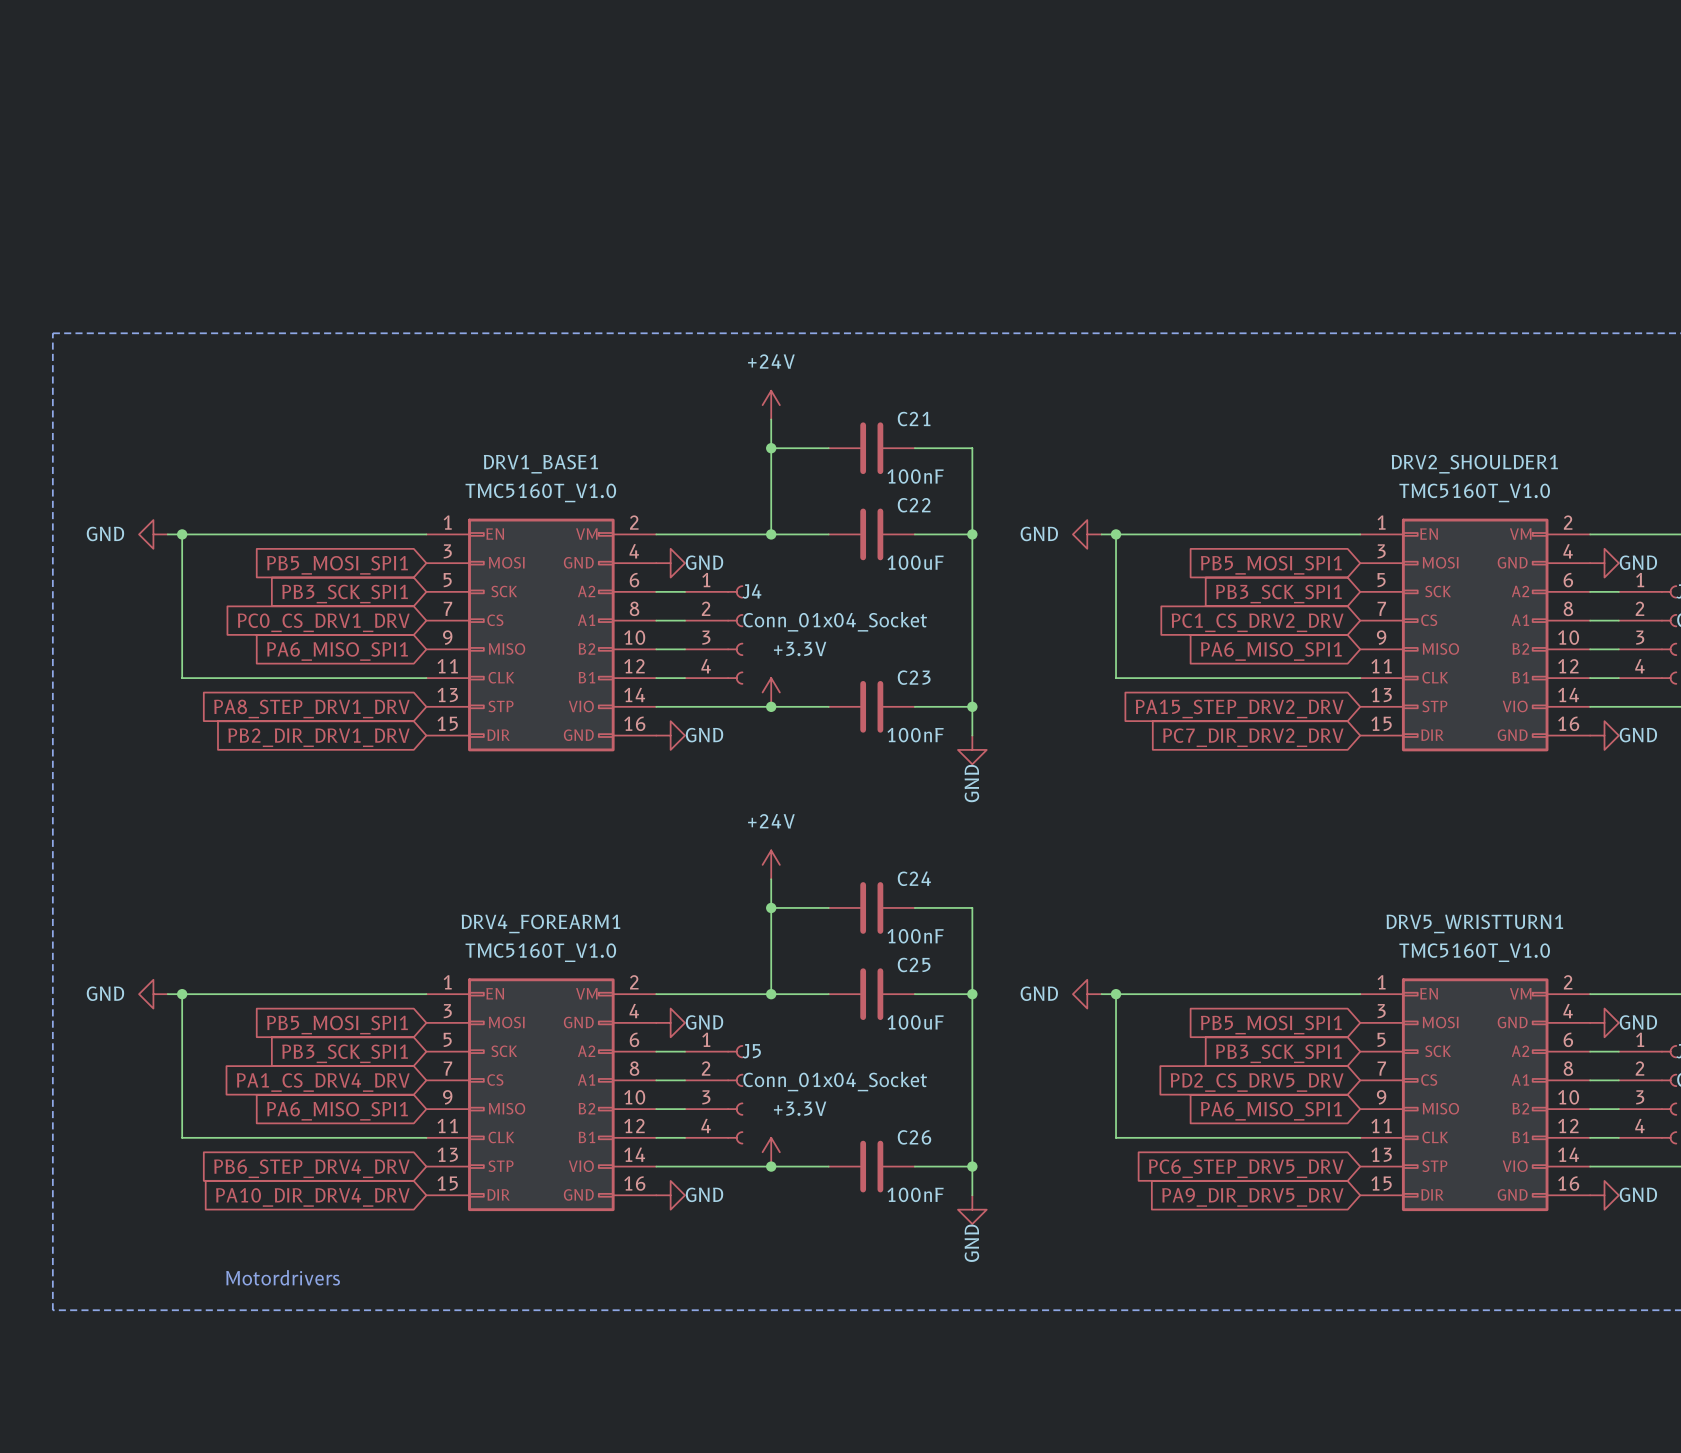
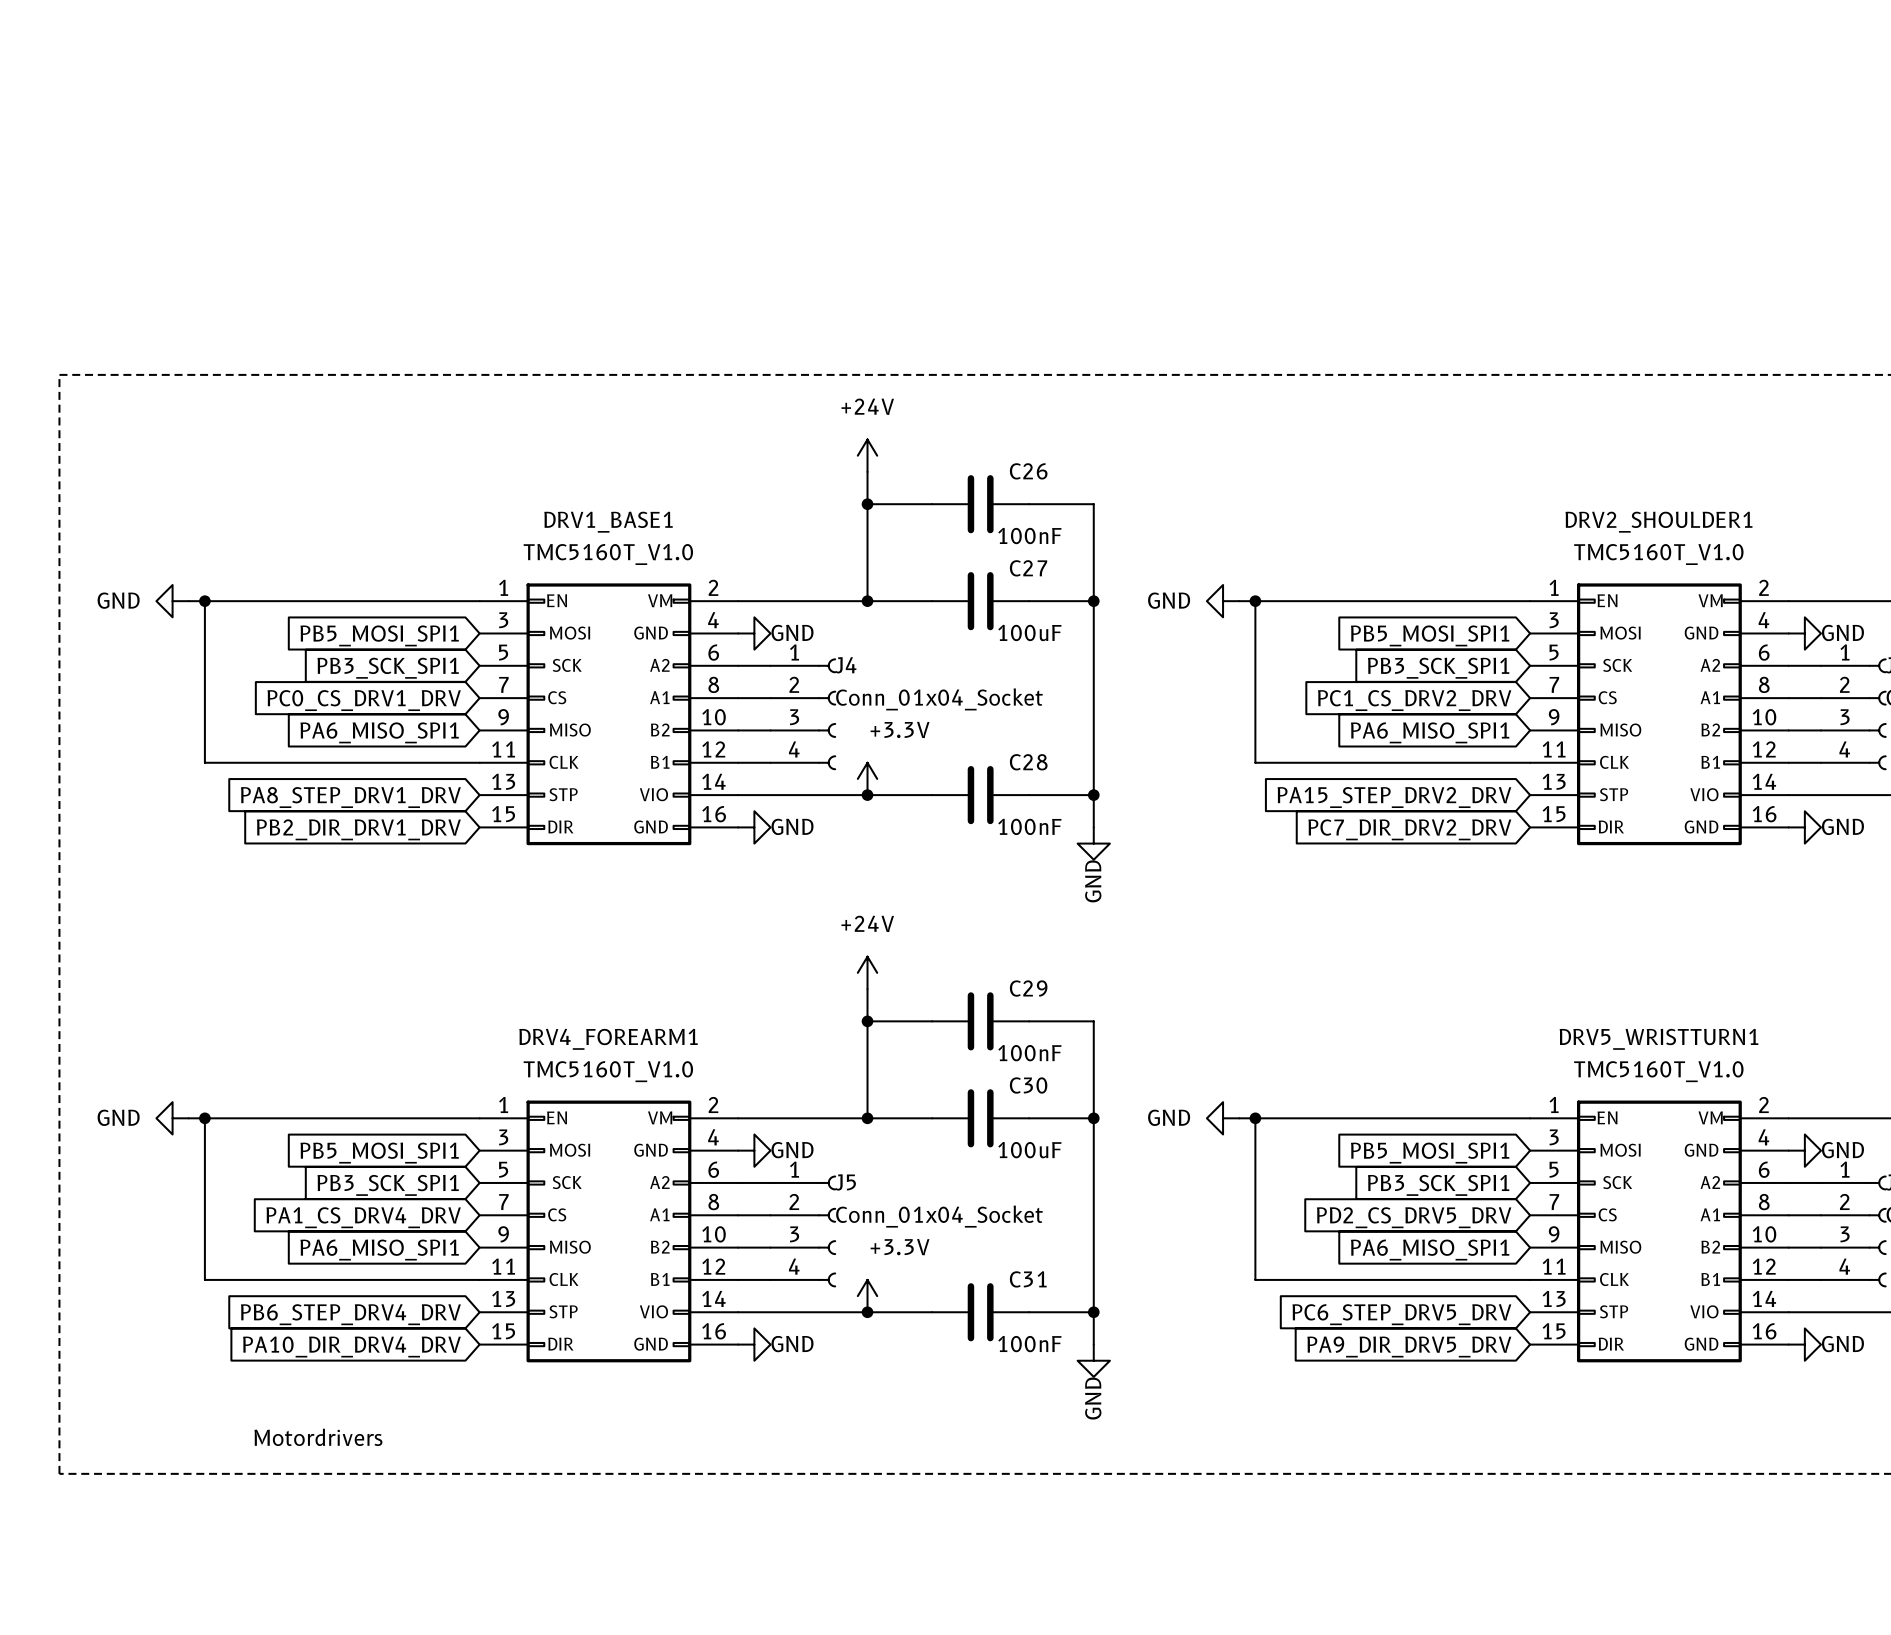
C21 name: C21 (914, 419) -> C26 (1028, 471)
C22 name: C22 (914, 505) -> C27 (1028, 568)
C23 name: C23 (914, 677) -> C28 (1028, 762)
C24 name: C24 (914, 878) -> C29 (1028, 988)
C25 name: C25 (914, 964) -> C30 (1028, 1085)
C26 name: C26 (914, 1137) -> C31 (1028, 1279)

